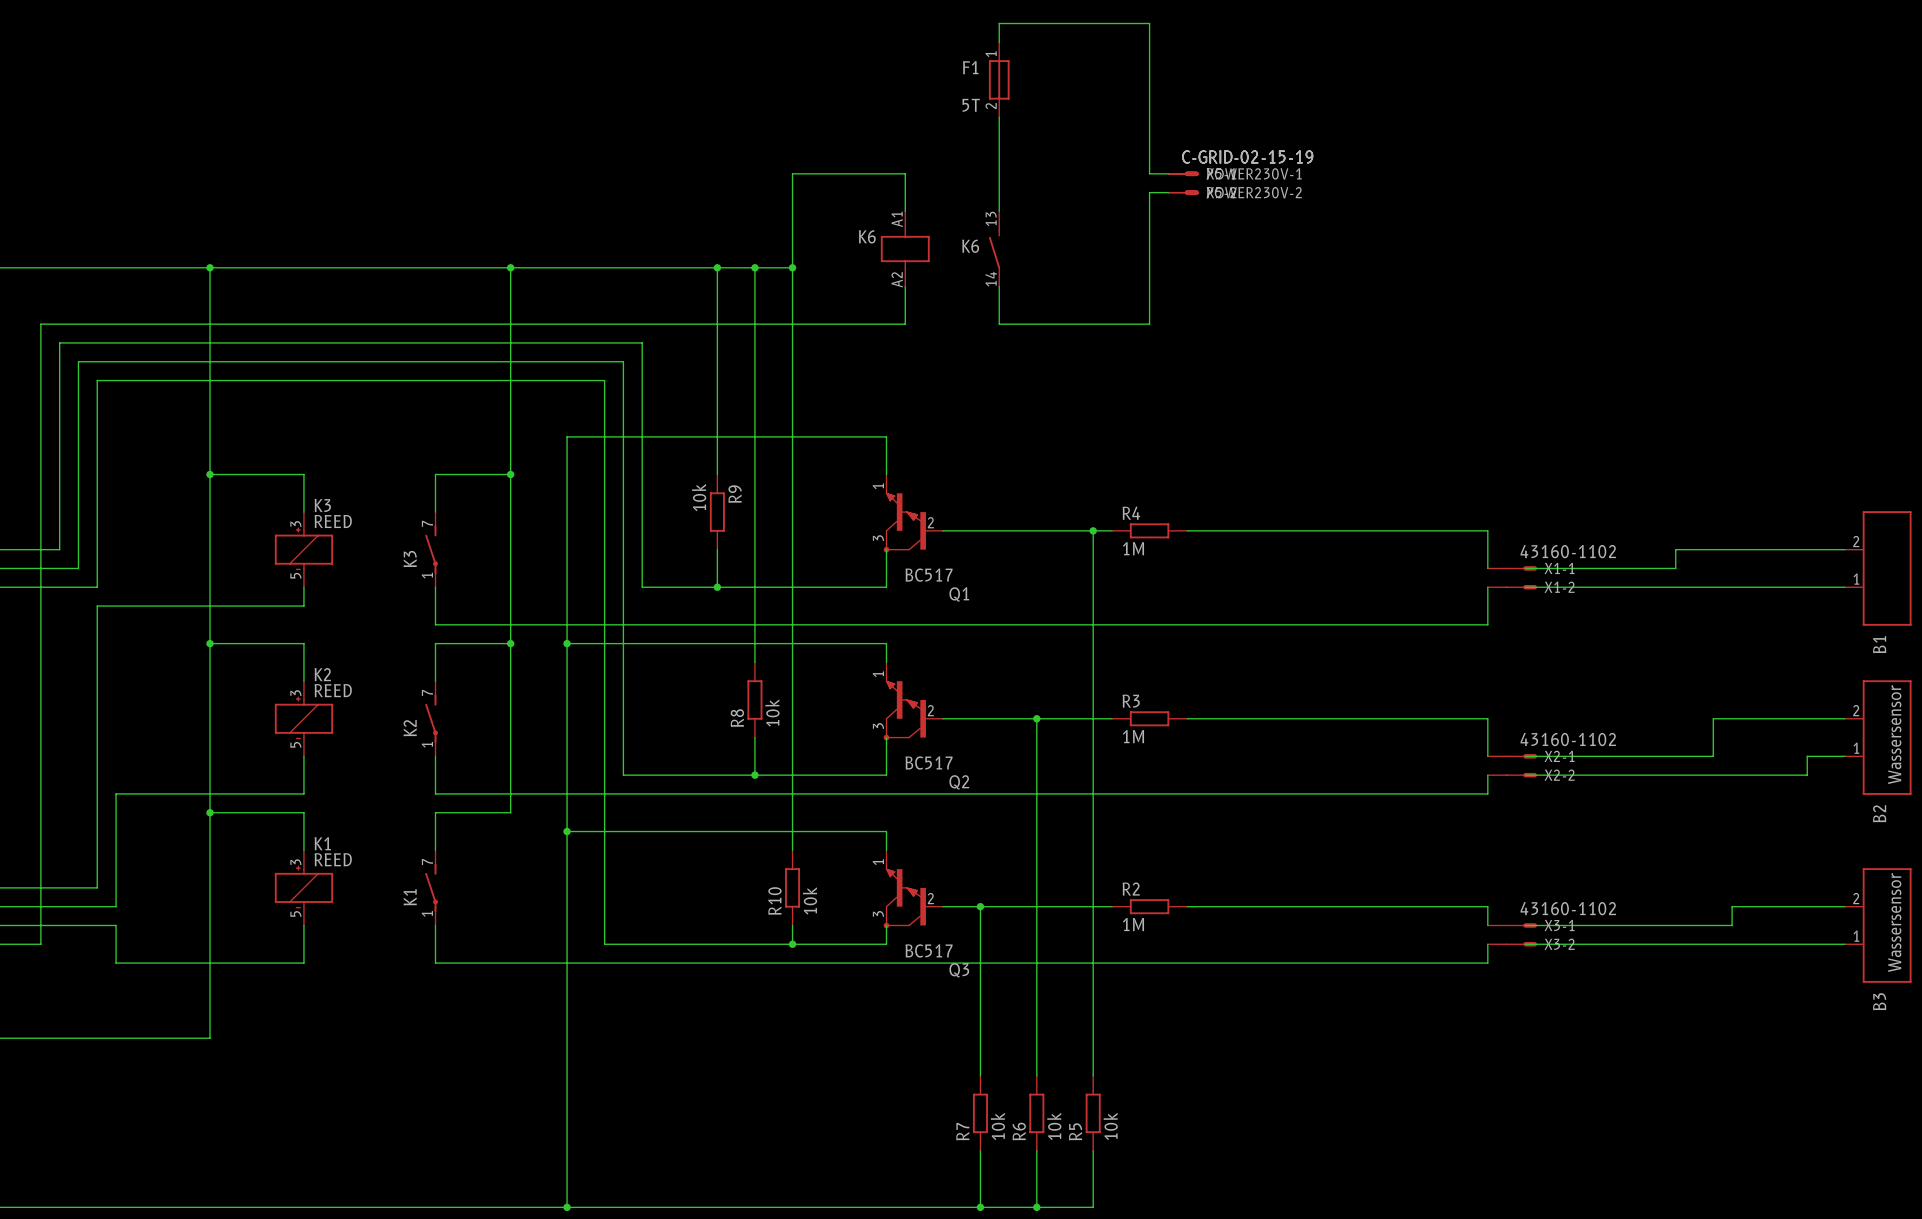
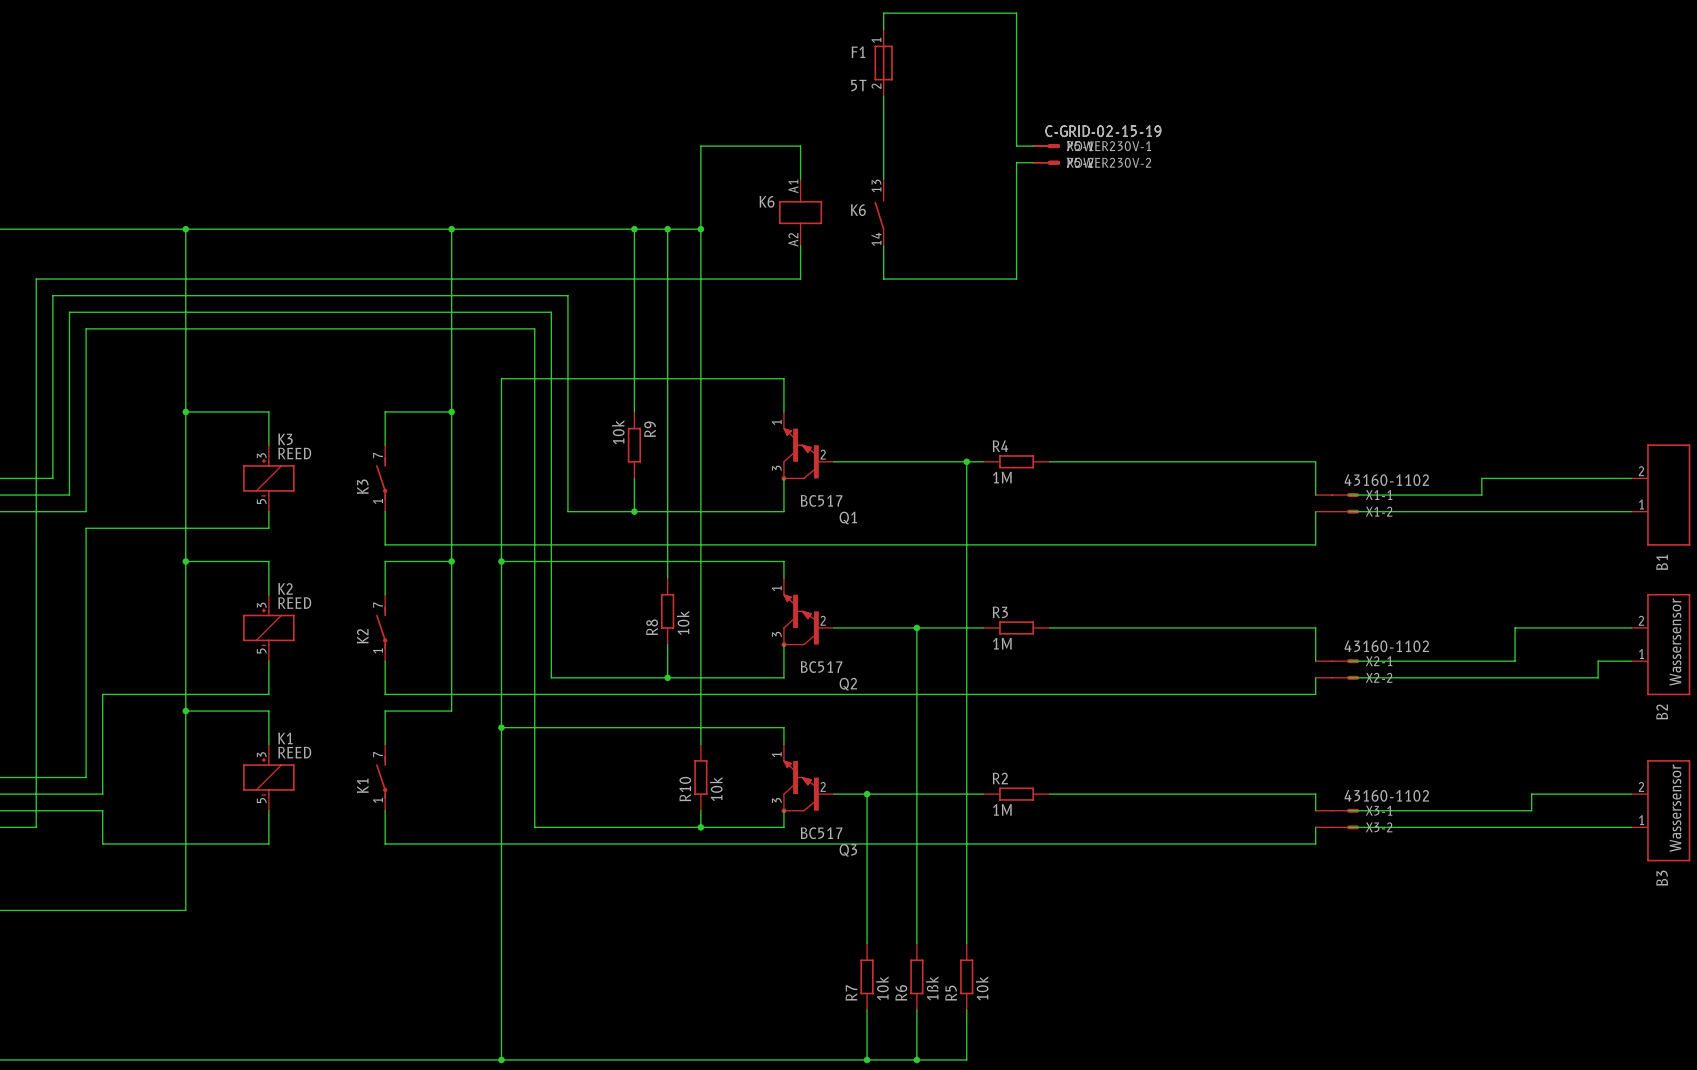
R6 value: 10k (1054, 1126) -> 1ßk (932, 988)

